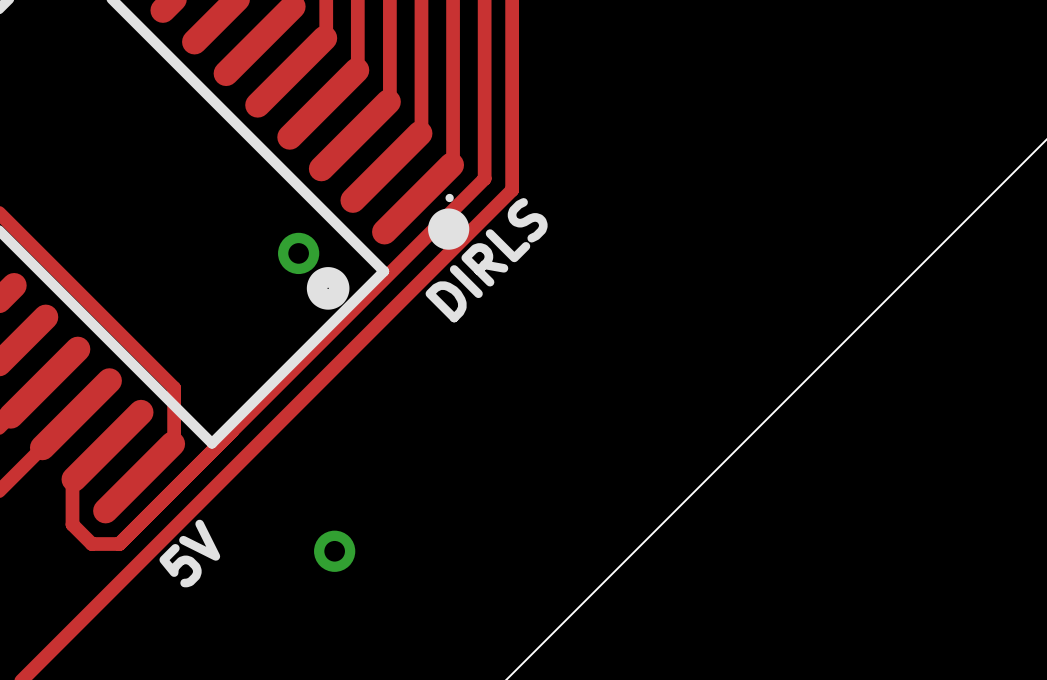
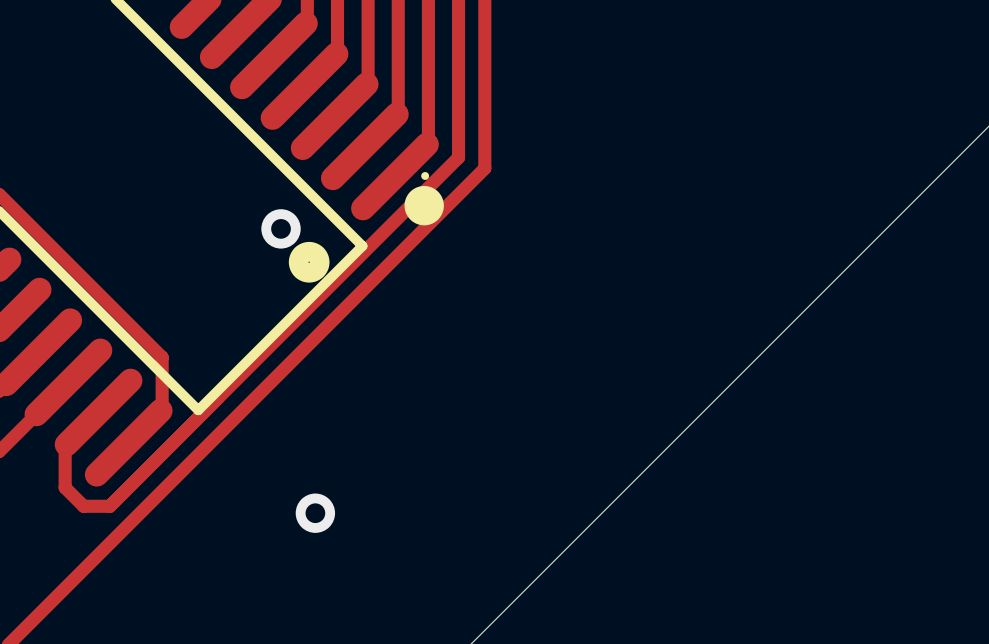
text: 5V DIRLS (353, 392) -> none

